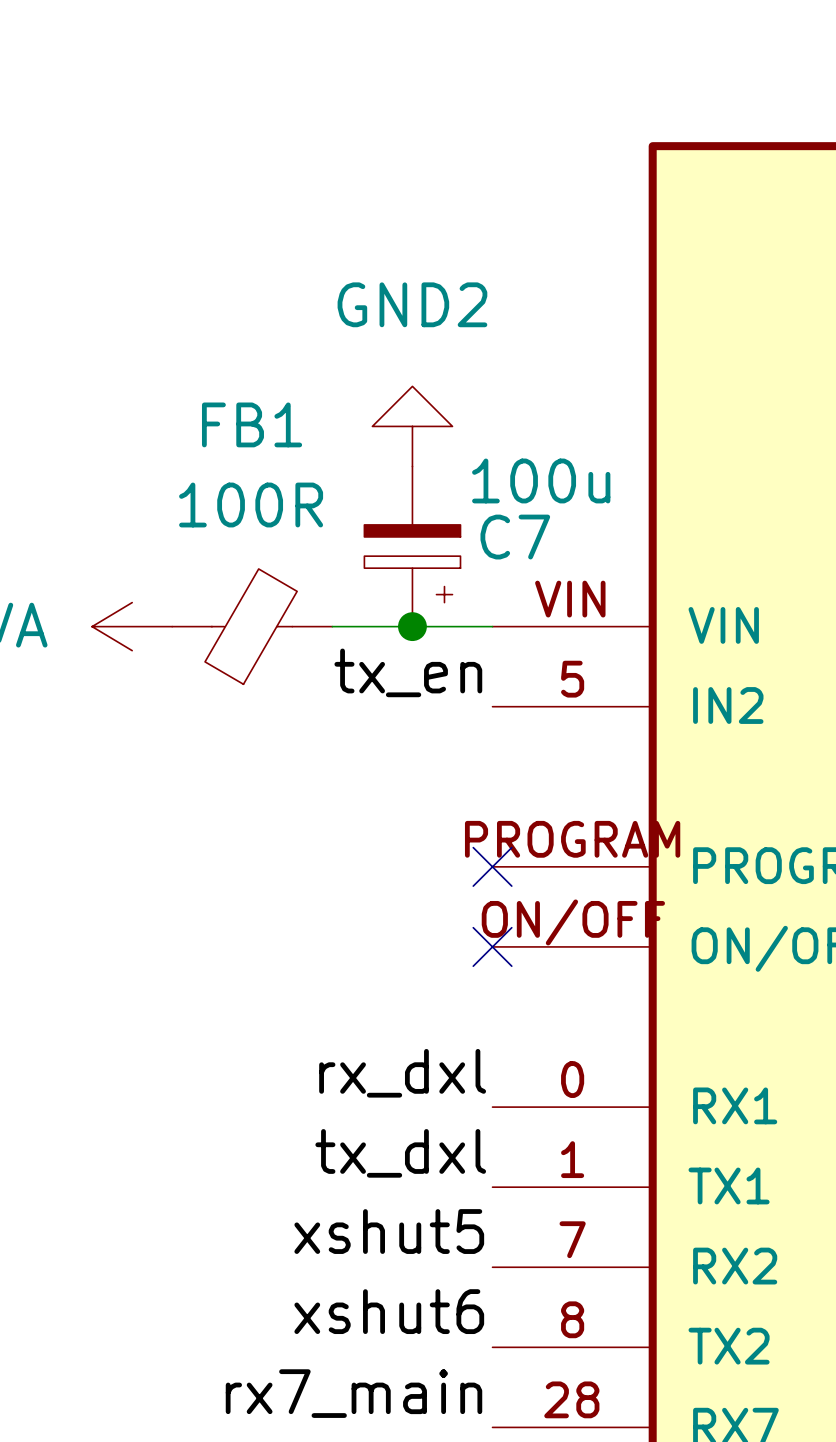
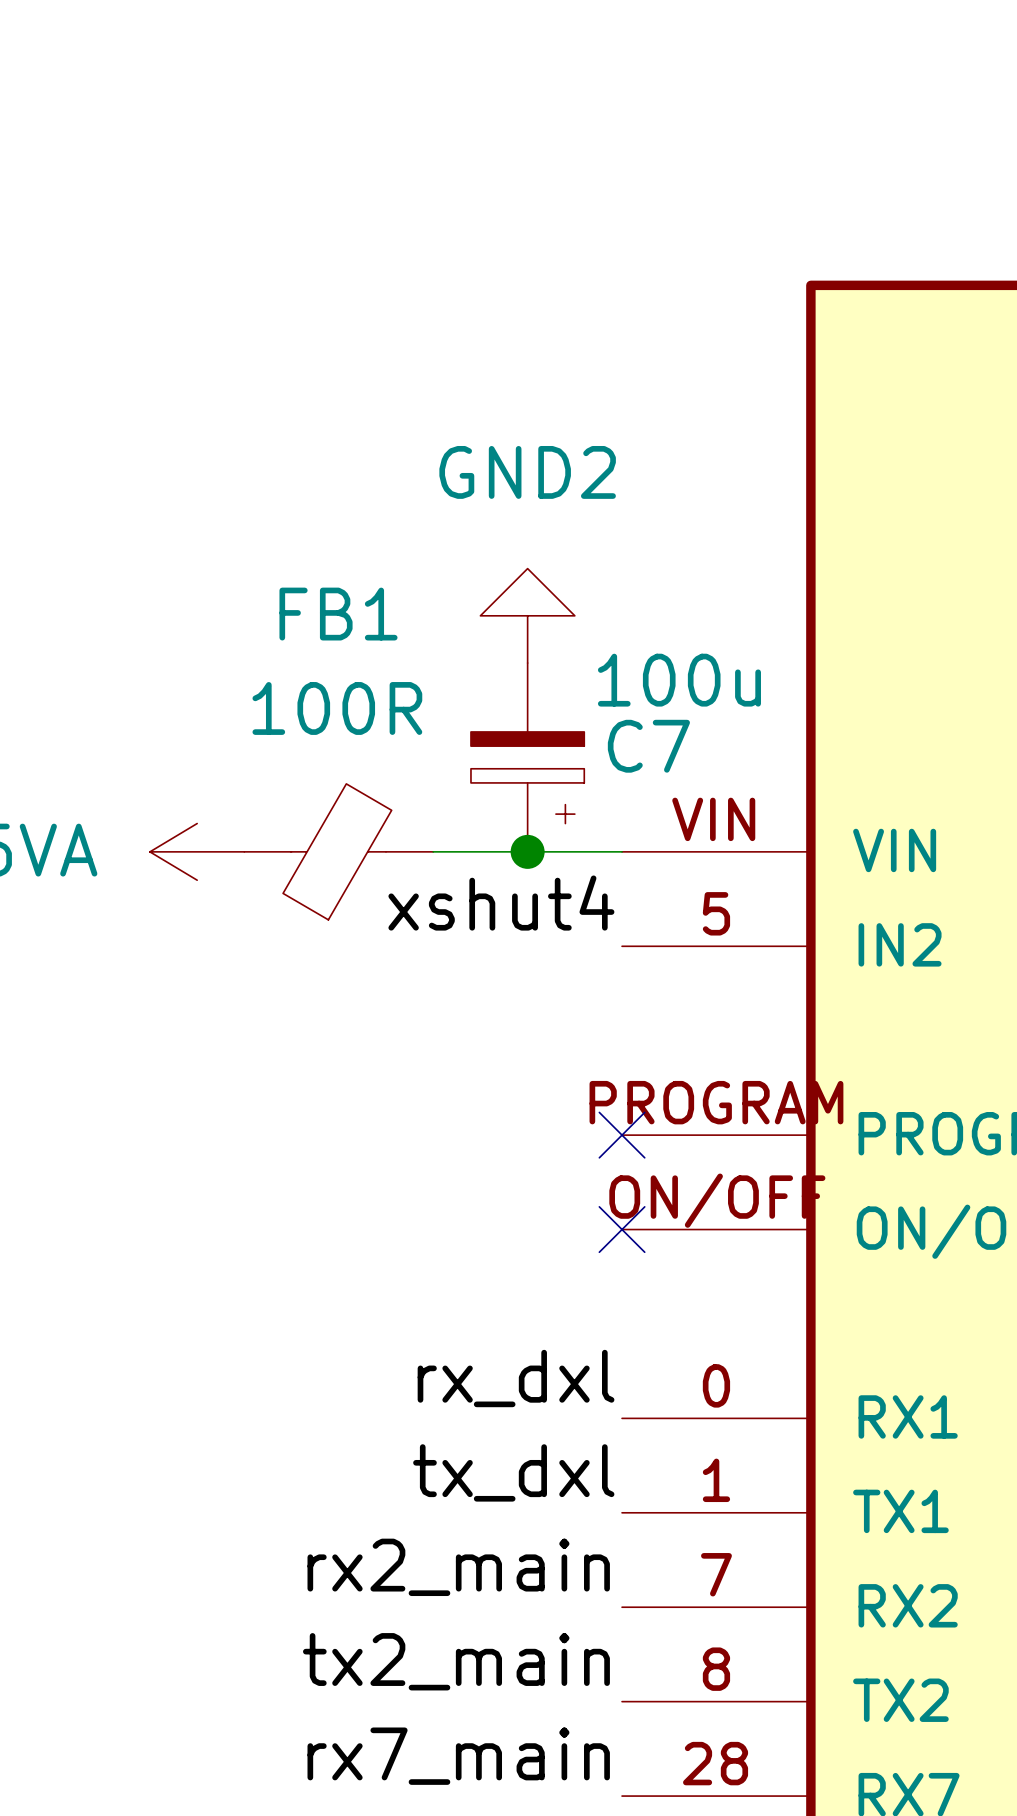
label: tx_en (408, 672) -> xshut4 (501, 903)
label: xshut5 (389, 1231) -> rx2_main (458, 1567)
label: xshut6 (389, 1311) -> tx2_main (456, 1661)

